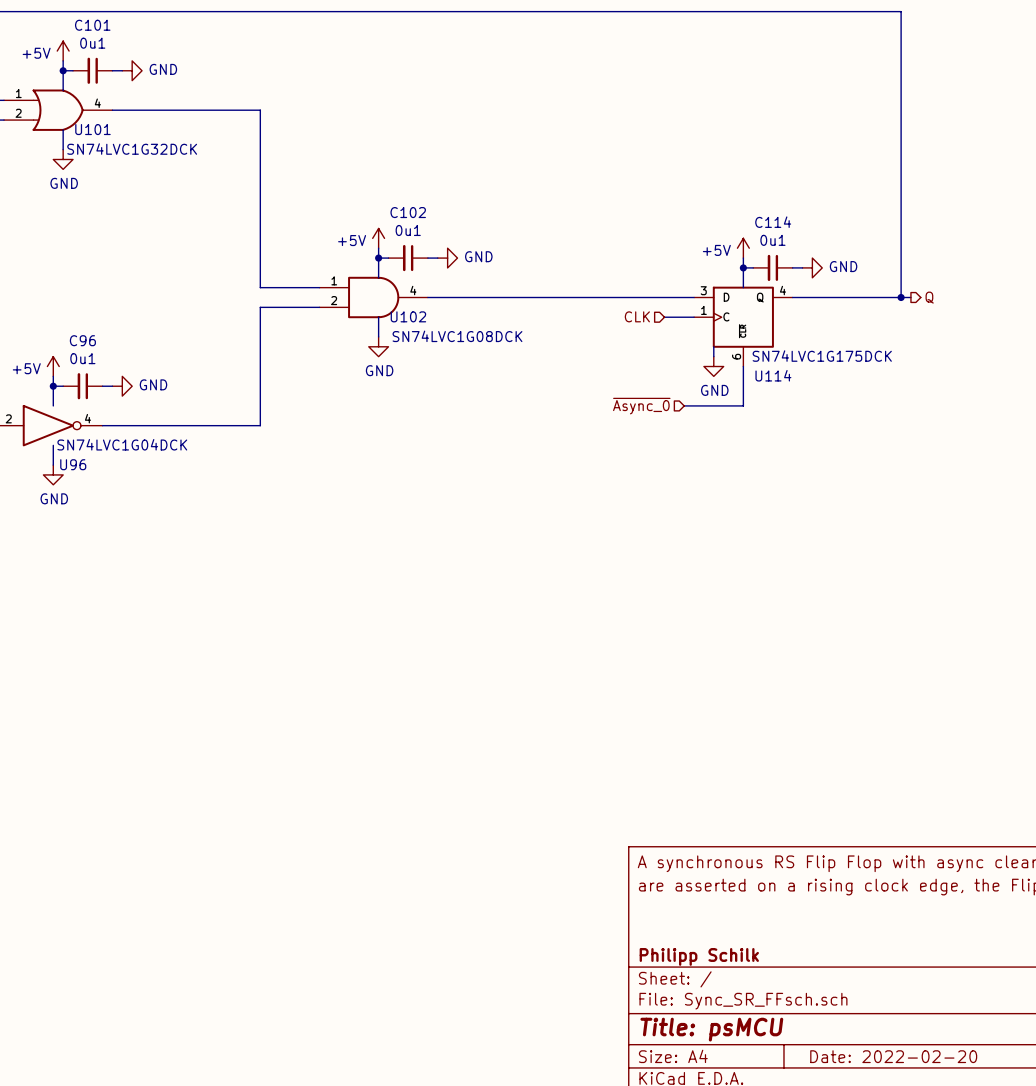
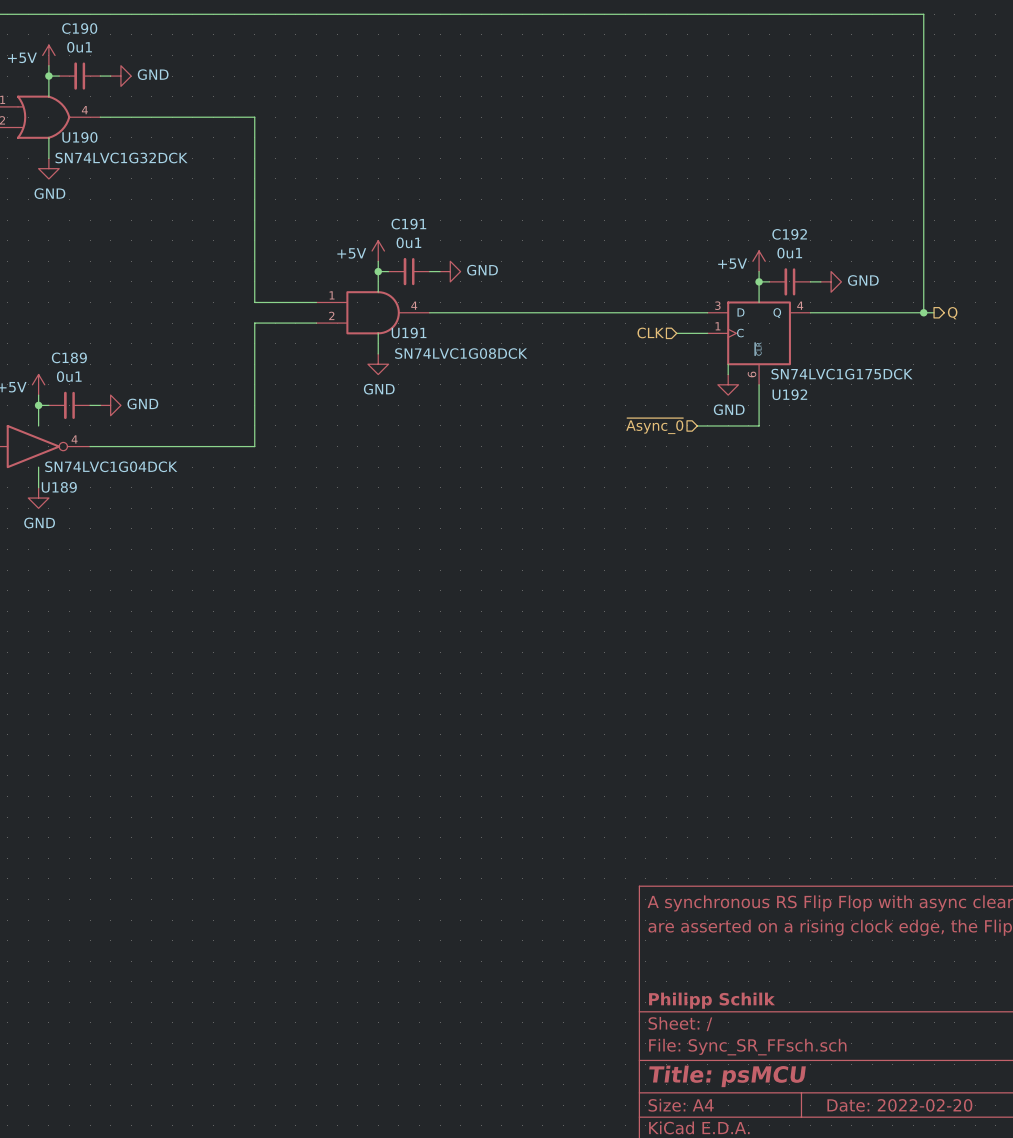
C101 name: C101 (92, 25) -> C190 (79, 28)
U101 name: U101 (92, 129) -> U190 (79, 137)
C102 name: C102 (408, 212) -> C191 (408, 224)
C114 name: C114 (773, 222) -> C192 (789, 234)
U102 name: U102 (408, 316) -> U191 (409, 332)
C96 name: C96 (82, 340) -> C189 (69, 357)
U114 name: U114 (773, 375) -> U192 (789, 394)
U96 name: U96 (73, 464) -> U189 (59, 487)

